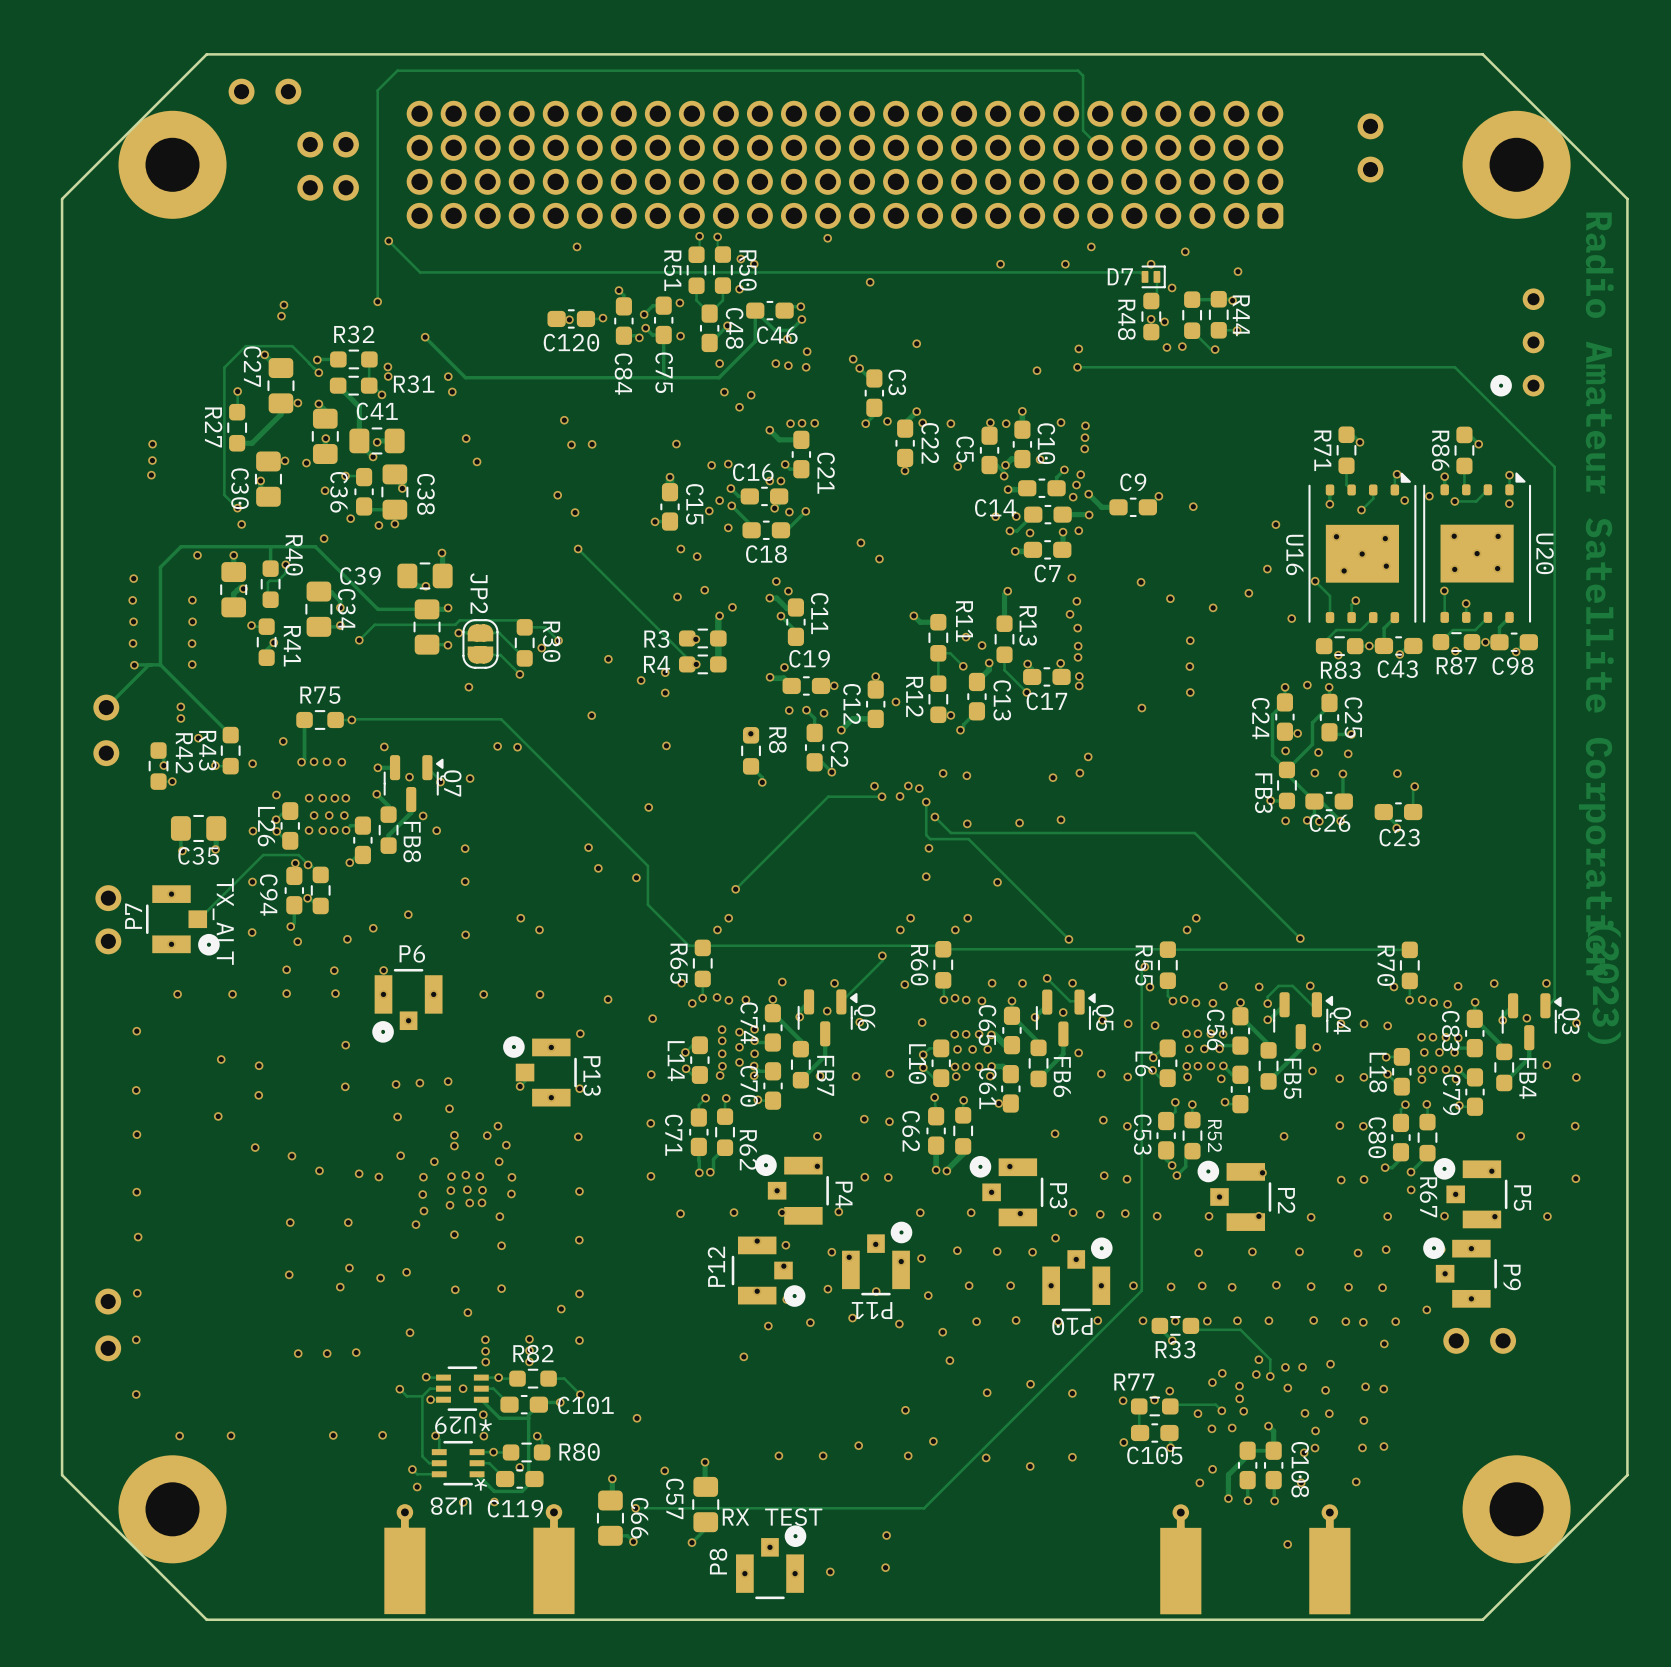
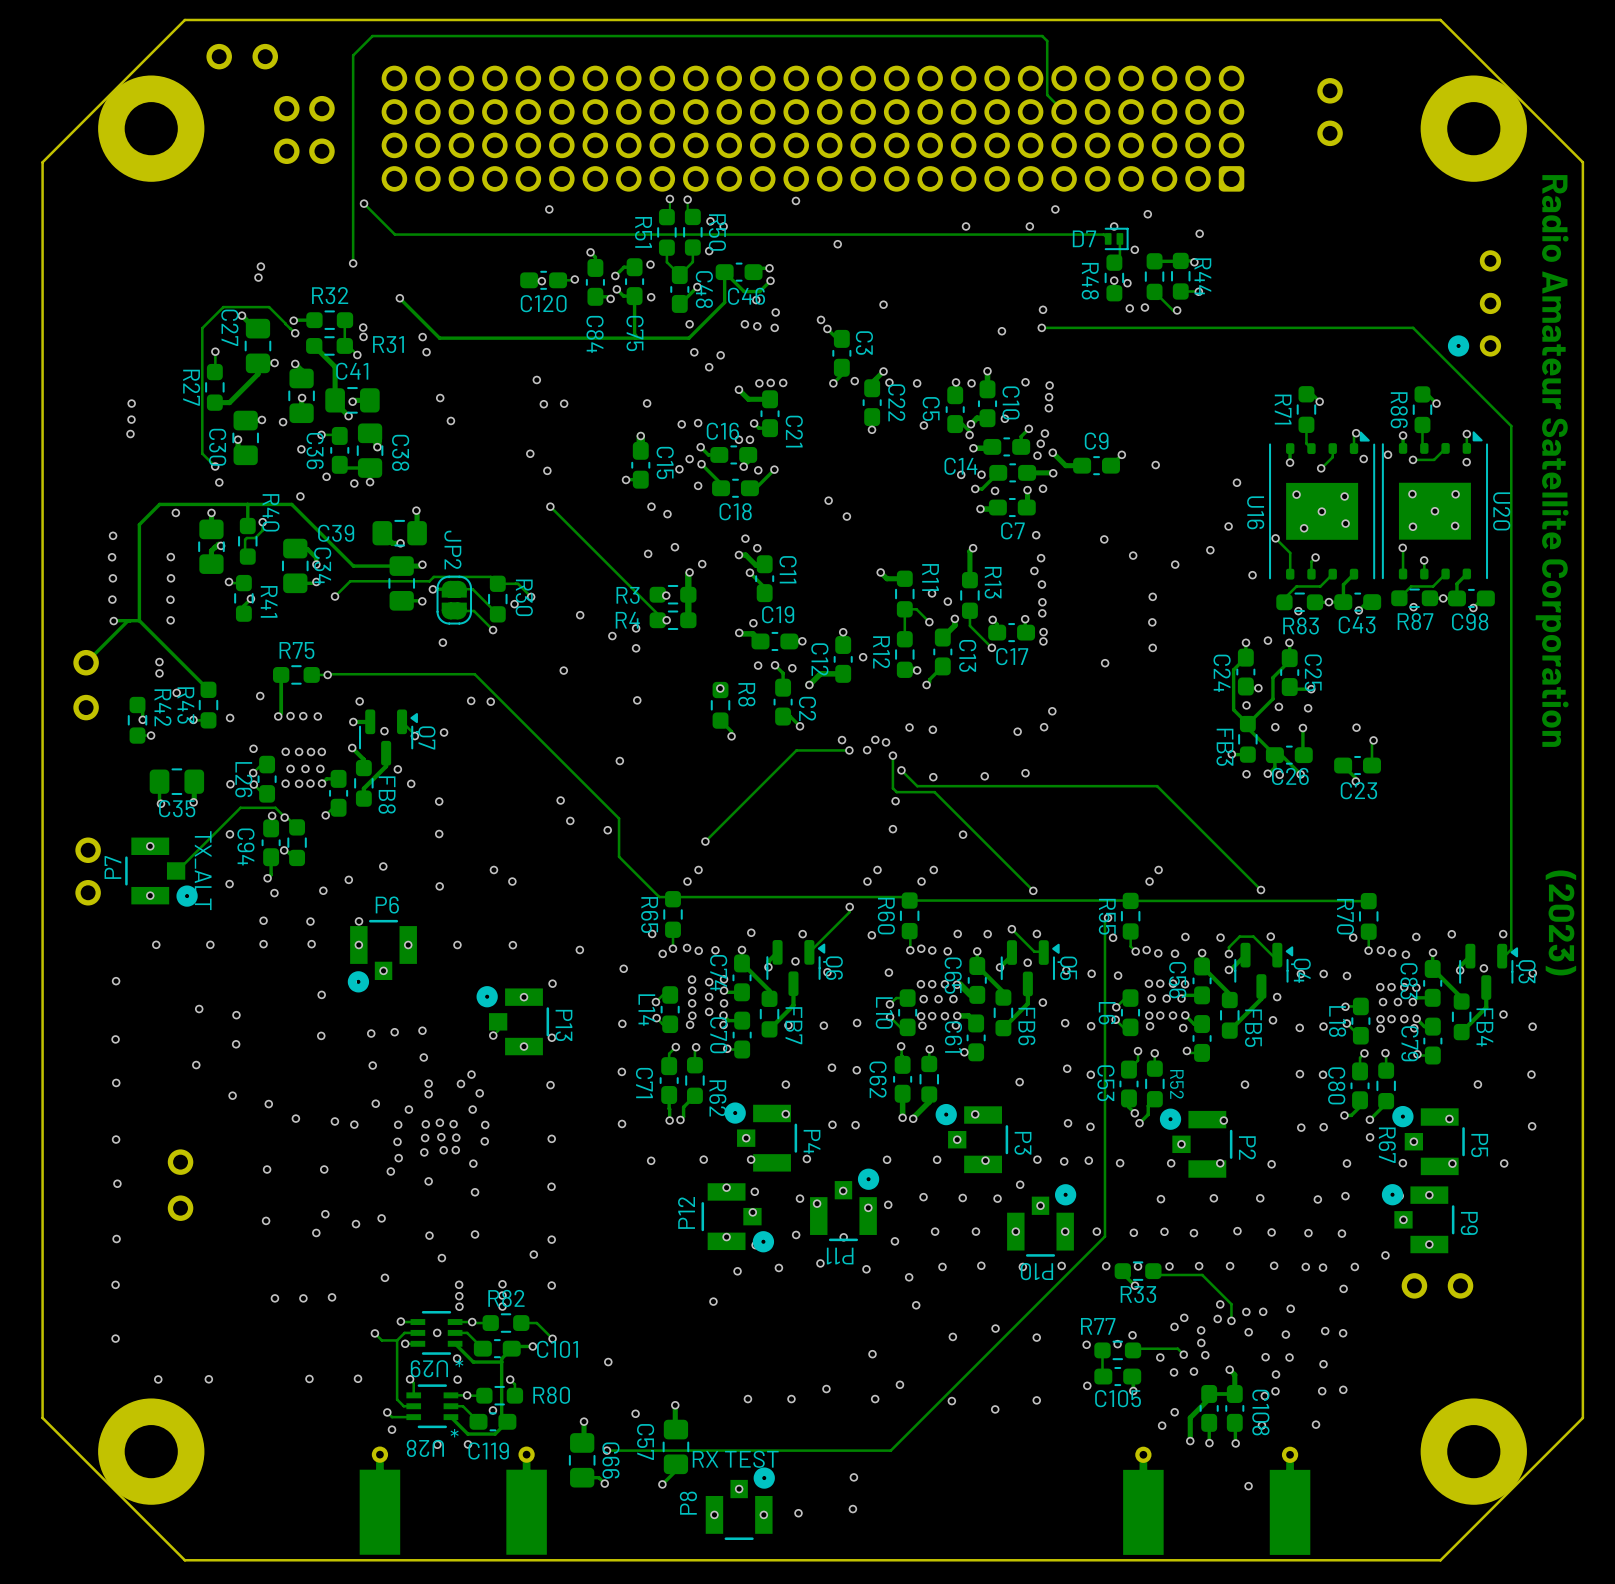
part: none -> (180, 1162)
part: none -> (180, 1208)
part: (108, 1301) -> none
part: (108, 1348) -> none

